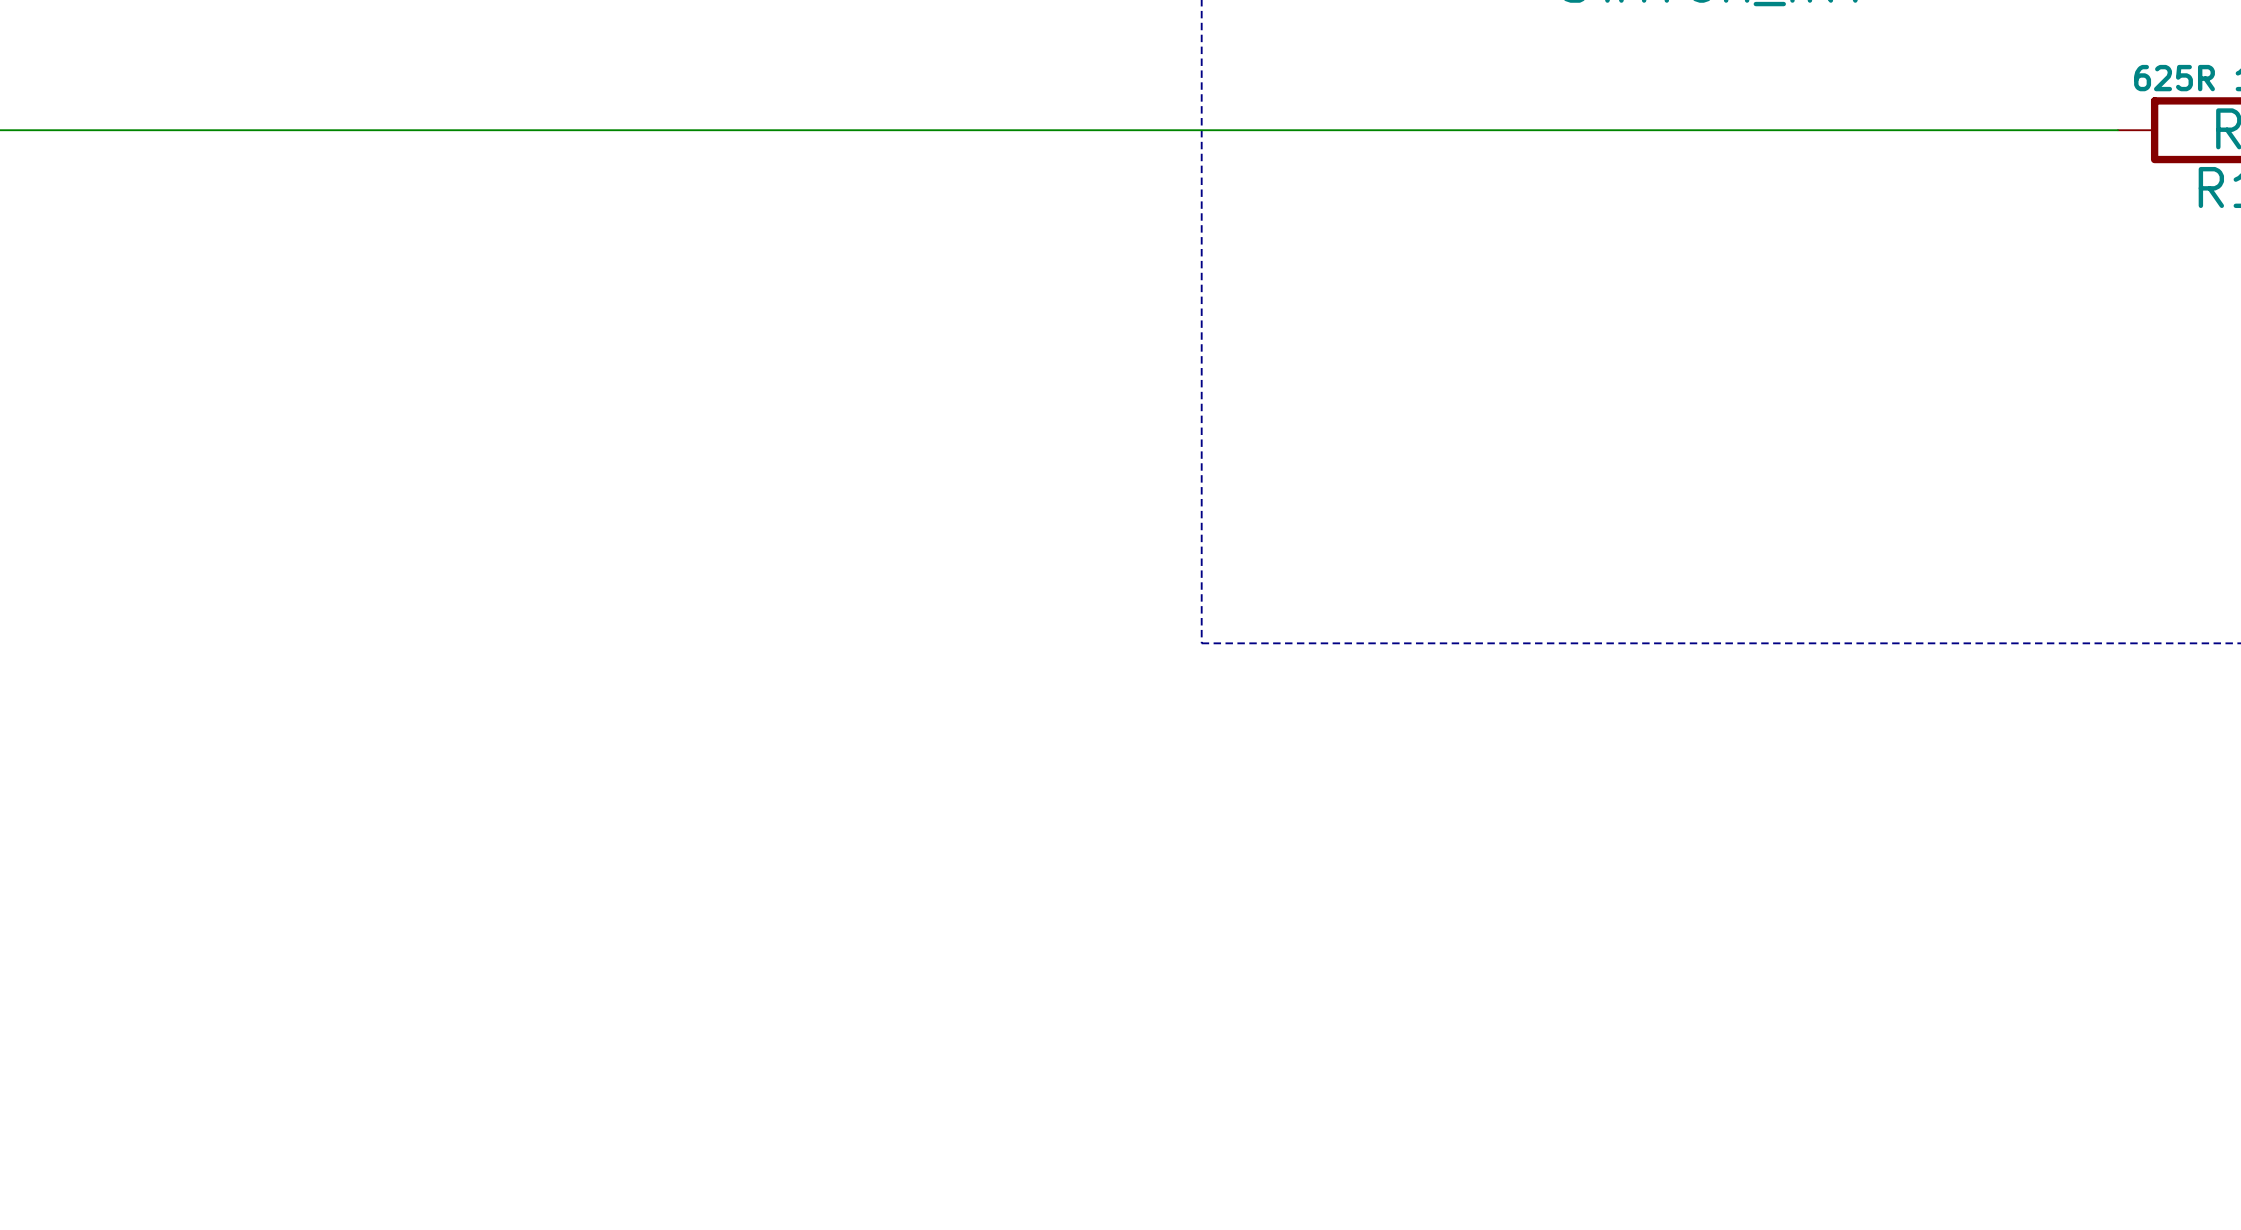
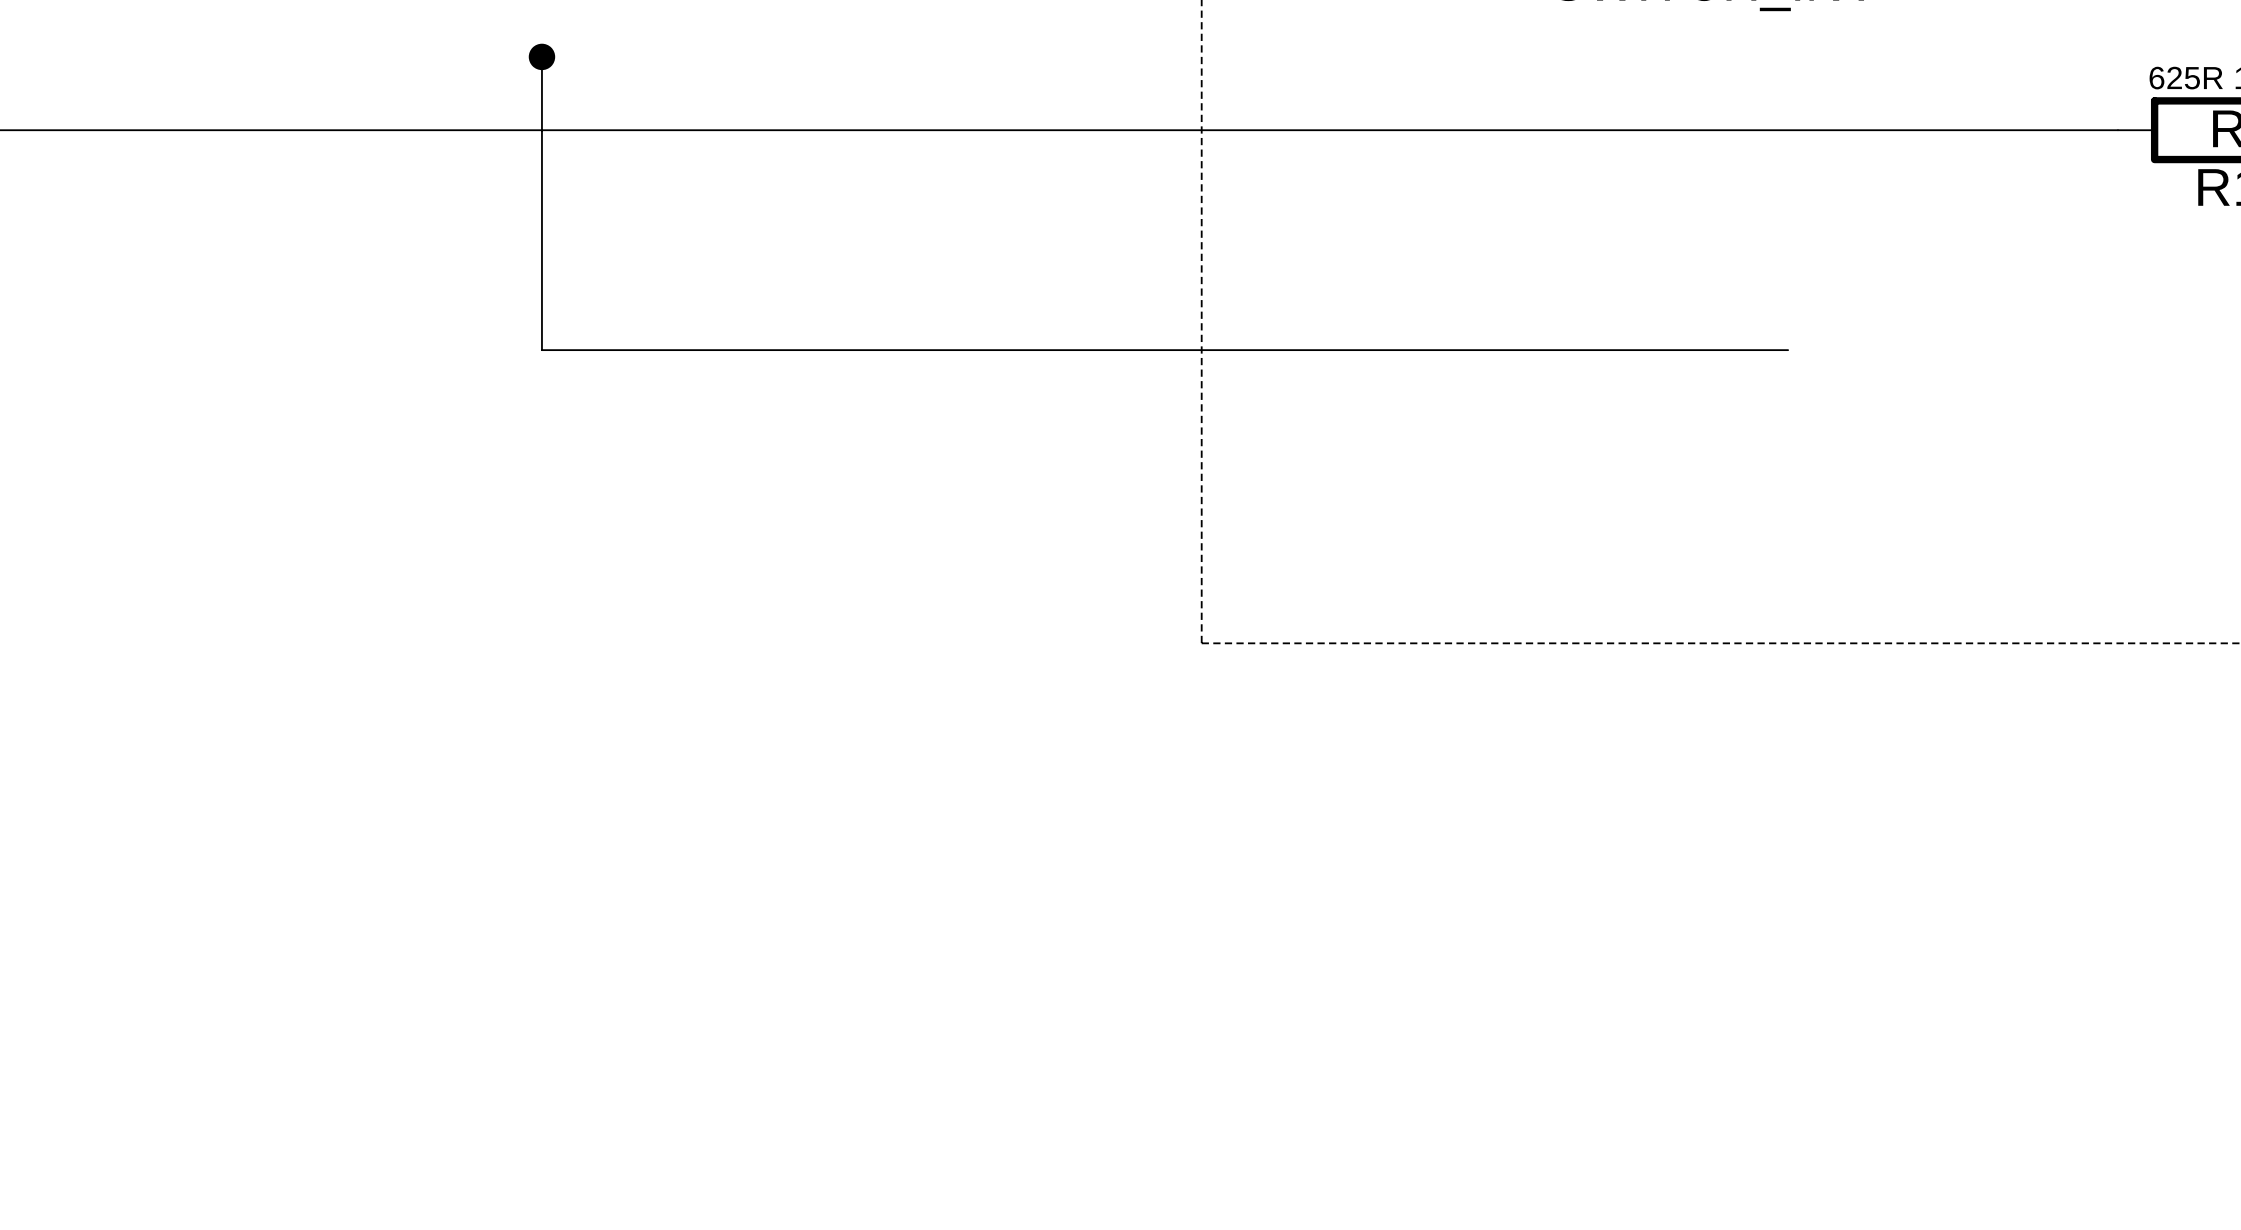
wire: none -> (541, 56) (541, 350) (1788, 350)
junction: none -> (541, 56)

